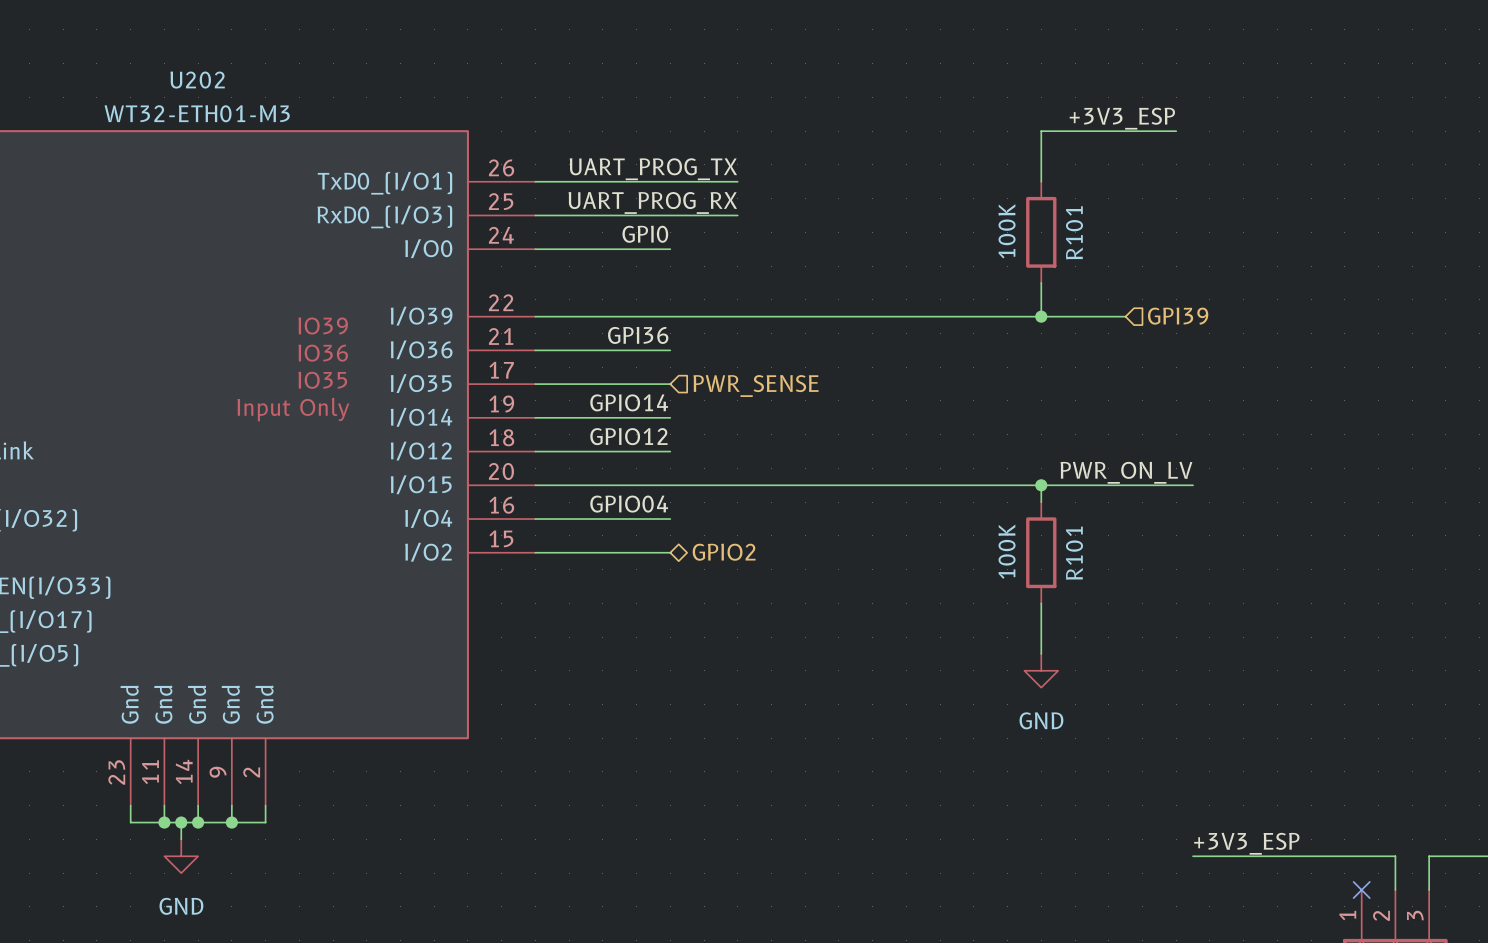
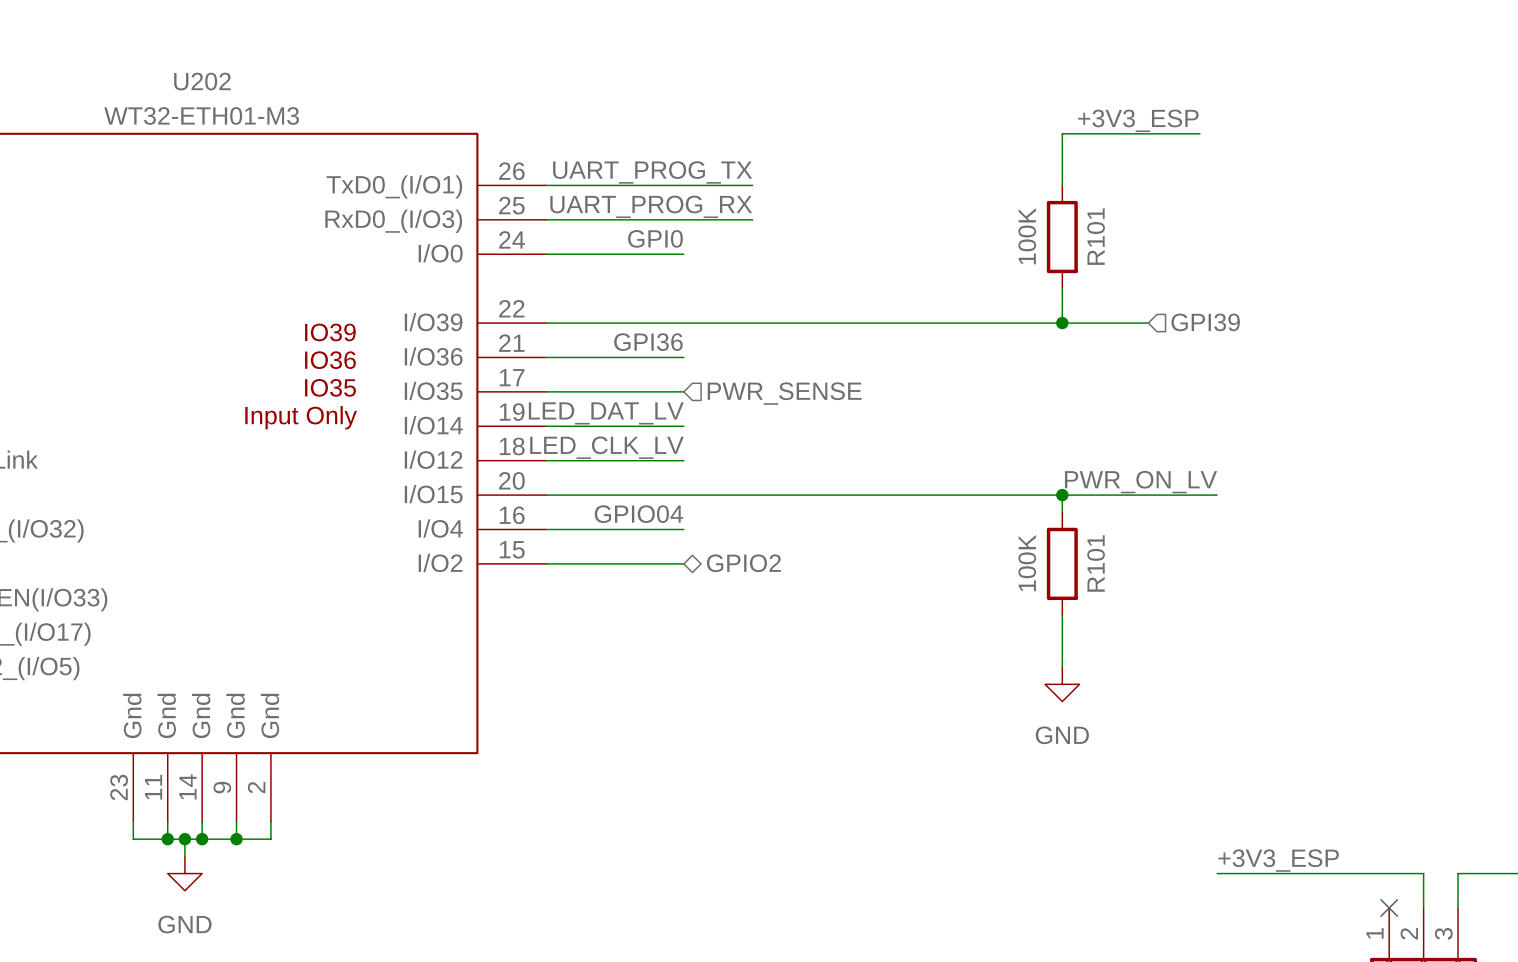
label: GPIO14 (629, 402) -> LED_DAT_LV (606, 413)
label: GPIO12 (628, 436) -> LED_CLK_LV (606, 447)

